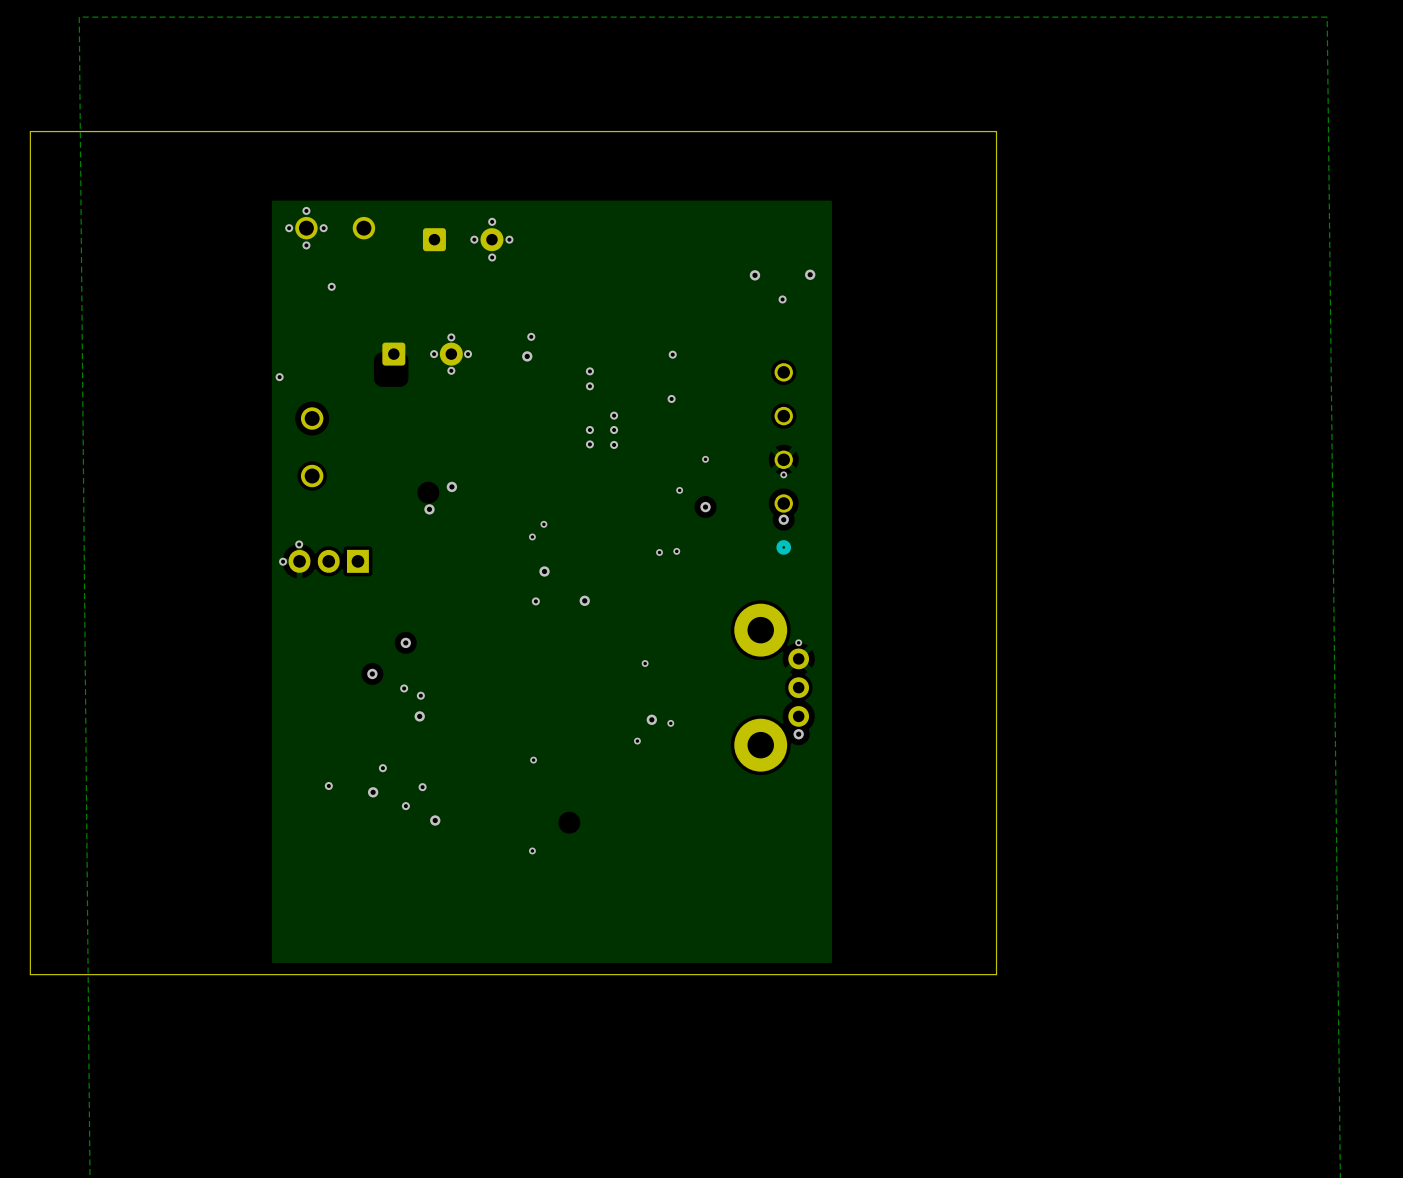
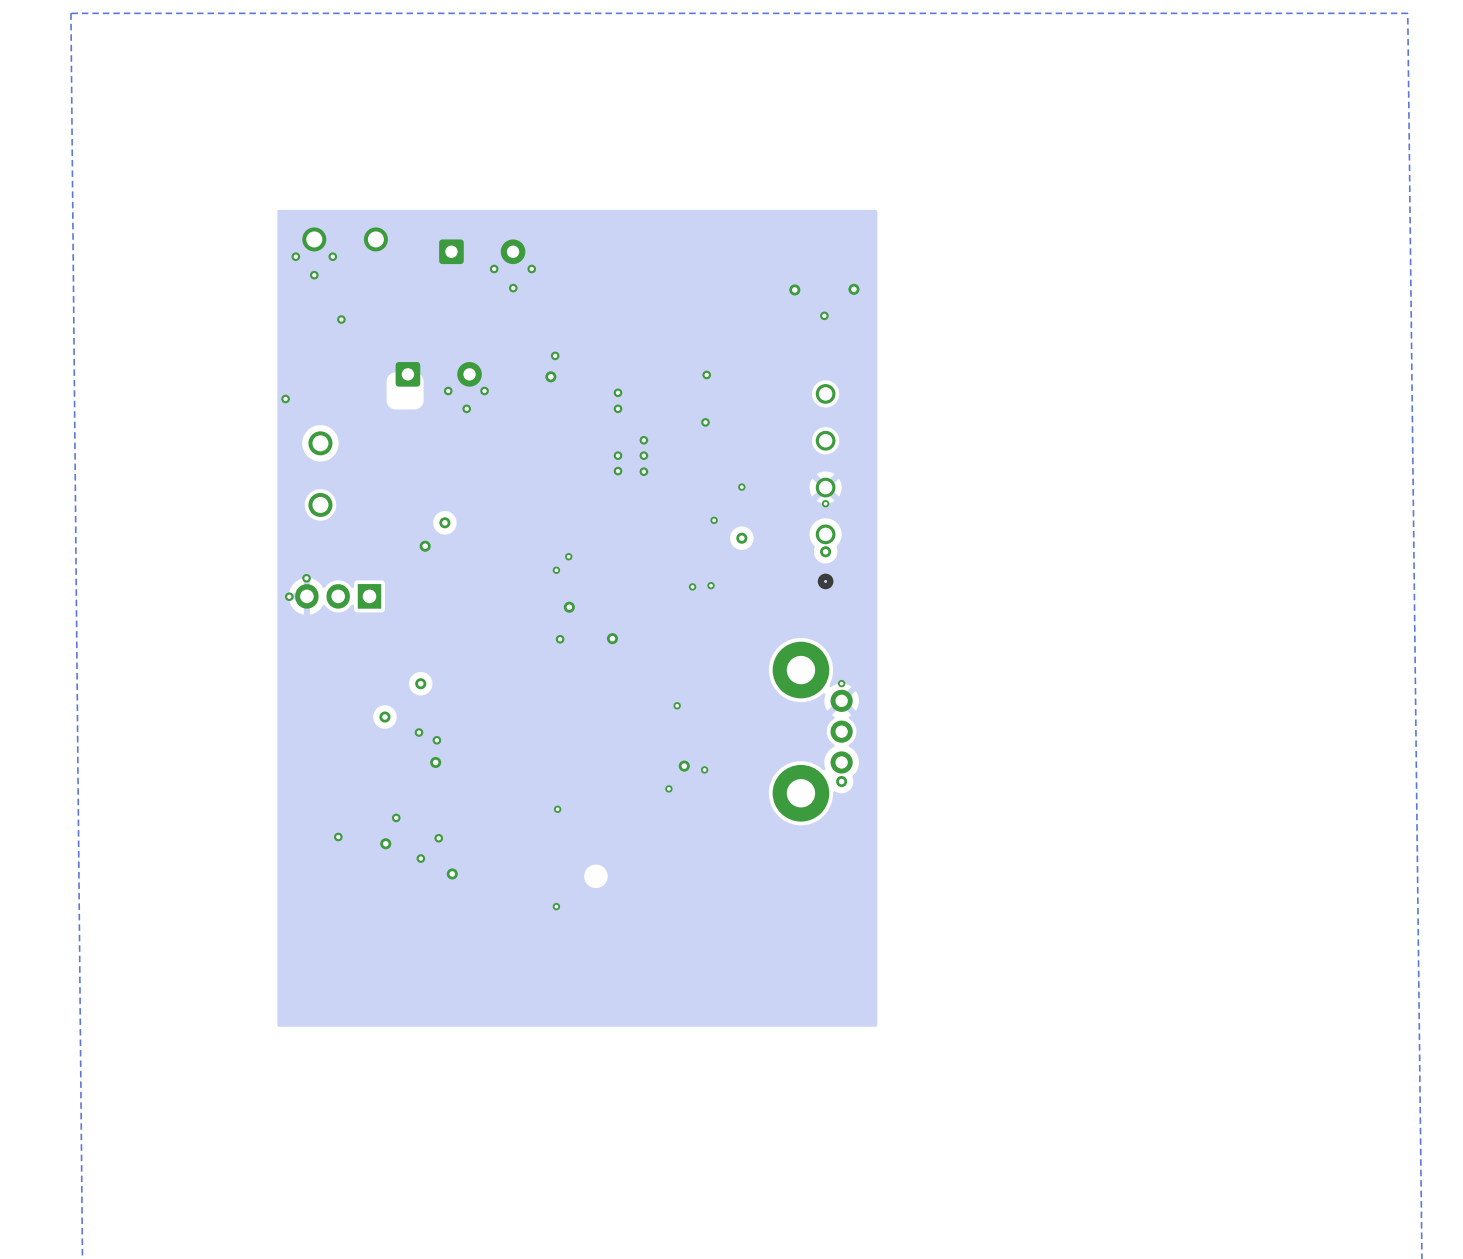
board edge: (996, 131) (30, 131) (30, 974) (996, 974) (996, 131) -> none
via: (306, 210) -> none
via: (492, 221) -> none
via: (289, 228) -> none
via: (323, 228) -> none
via: (474, 239) -> none
via: (509, 239) -> none
via: none -> (295, 256)
via: none -> (332, 256)
via: (306, 245) -> none
via: none -> (494, 269)
via: none -> (531, 269)
via: (492, 257) -> none
via: none -> (314, 275)
via: none -> (513, 288)
via position: (331, 286) -> (341, 319)
via: (451, 337) -> none
via: (434, 354) -> none
via: (468, 354) -> none
via: none -> (448, 390)
via: none -> (484, 390)
via: (451, 370) -> none
via: none -> (466, 408)
via: (451, 486) -> none
via: none -> (444, 522)
via: (429, 509) -> none
via: none -> (425, 546)

